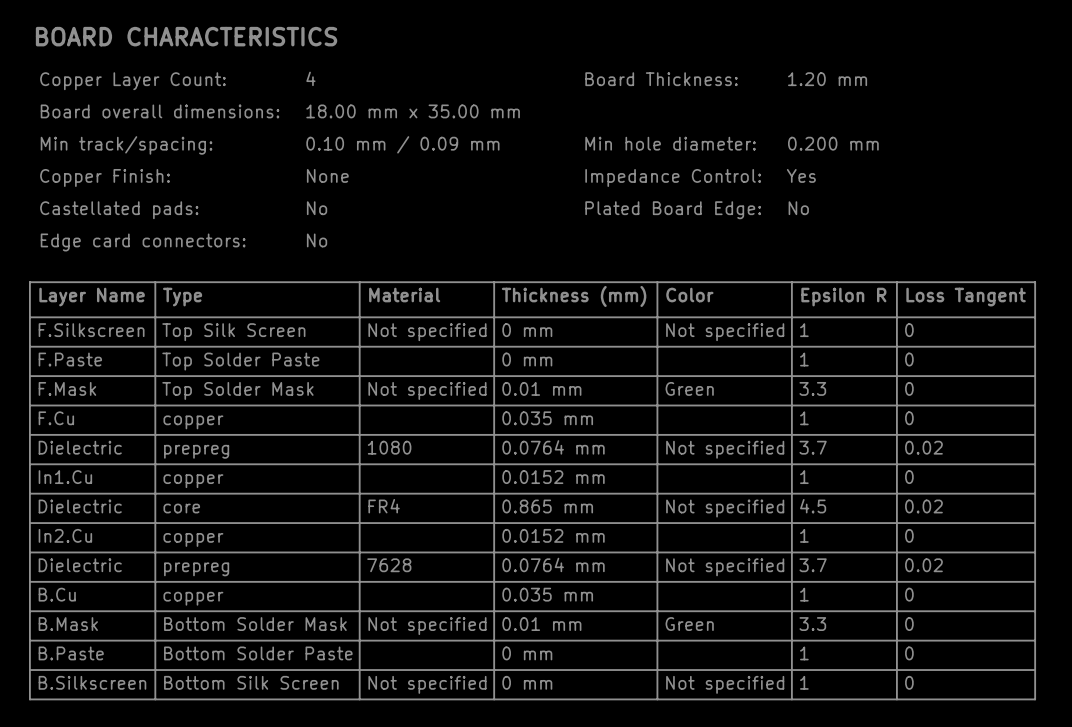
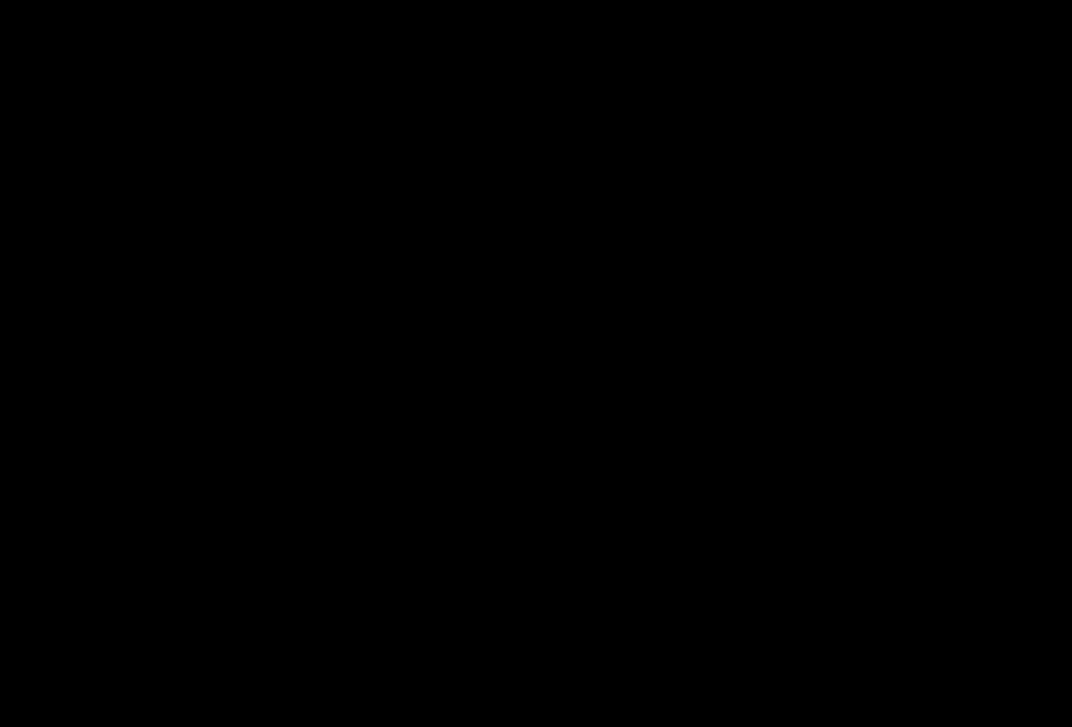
text: BOARD CHARACTERISTICS (186, 36) -> none
text: 4 (310, 78) -> none
text: Board Thickness: (661, 79) -> none
text: 1.20 mm (827, 79) -> none
text: Copper Layer Count: (132, 81) -> none
text: Board overall dimensions: (160, 111) -> none
text: 18.00 mm x 35.00 mm (413, 111) -> none
text: Min hole diameter: (670, 143) -> none
text: 0.200 mm (833, 143) -> none
text: 0.10 mm / 0.09 mm (402, 144) -> none
text: Min track/spacing: (126, 145) -> none
text: None (327, 175) -> none
text: Yes (801, 175) -> none
text: Copper Finish: (105, 177) -> none
text: Impedance Control: (673, 177) -> none
text: No (317, 208) -> none
text: No (798, 208) -> none
text: Castellated pads: (119, 210) -> none
text: Plated Board Edge: (673, 210) -> none
text: No (317, 240) -> none
text: Edge card connectors: (143, 242) -> none
line: (29, 282) (29, 699) (1035, 699) (1035, 282) (29, 282) -> none
line: (155, 282) (155, 699) -> none
line: (359, 282) (359, 699) -> none
line: (494, 282) (494, 699) -> none
line: (657, 282) (657, 699) -> none
line: (791, 282) (791, 699) -> none
line: (896, 282) (896, 699) -> none
text: Material (404, 295) -> none
text: Color (689, 295) -> none
text: Thickness (mm) (574, 296) -> none
text: Layer Name (92, 297) -> none
text: Type (182, 297) -> none
text: Epsilon R (843, 297) -> none
text: Loss Tangent (966, 297) -> none
line: (29, 317) (1035, 317) -> none
text: F.Silkscreen (91, 330) -> none
text: 0 mm (527, 330) -> none
text: 1 (804, 330) -> none
text: 0 (909, 330) -> none
text: Top Silk Screen (233, 332) -> none
text: Not specified (427, 332) -> none
text: Not specified (725, 332) -> none
line: (29, 346) (1035, 346) -> none
text: F.Paste (70, 359) -> none
text: 0 mm (527, 359) -> none
text: 1 (804, 359) -> none
text: 0 (909, 359) -> none
text: Top Solder Paste (240, 361) -> none
line: (29, 376) (1035, 376) -> none
text: F.Mask (67, 388) -> none
text: 0.01 mm (541, 388) -> none
text: Green (689, 388) -> none
text: 3.3 (812, 388) -> none
text: 0 (909, 388) -> none
text: Top Solder Mask (237, 390) -> none
text: Not specified (427, 390) -> none
line: (29, 405) (1035, 405) -> none
text: F.Cu (56, 418) -> none
text: 0.035 mm (547, 418) -> none
text: 1 (804, 418) -> none
text: 0 (909, 418) -> none
text: copper (193, 422) -> none
line: (29, 434) (1035, 434) -> none
text: Dielectric (80, 447) -> none
text: 1080 (389, 447) -> none
text: 0.0764 mm (553, 447) -> none
text: 3.7 (813, 447) -> none
text: 0.02 (923, 447) -> none
text: Not specified (725, 449) -> none
text: prepreg (196, 451) -> none
line: (29, 464) (1035, 464) -> none
text: In1.Cu (65, 477) -> none
text: 0.0152 mm (553, 477) -> none
text: 1 (804, 477) -> none
text: 0 (909, 477) -> none
text: copper (193, 481) -> none
line: (29, 493) (1035, 493) -> none
text: Dielectric (80, 506) -> none
text: FR4 (384, 506) -> none
text: 0.865 mm (547, 506) -> none
text: 4.5 (813, 506) -> none
text: 0.02 (923, 506) -> none
text: core (181, 508) -> none
text: Not specified (725, 508) -> none
line: (29, 523) (1035, 523) -> none
text: In2.Cu (65, 535) -> none
text: 0.0152 mm (553, 535) -> none
text: 1 (804, 535) -> none
text: 0 (909, 535) -> none
text: copper (193, 539) -> none
line: (29, 552) (1035, 552) -> none
text: 0.0764 mm (553, 564) -> none
text: Dielectric (80, 565) -> none
text: 7628 (389, 565) -> none
text: 3.7 (813, 565) -> none
text: 0.02 (923, 565) -> none
text: Not specified (725, 567) -> none
text: prepreg (196, 569) -> none
line: (29, 581) (1035, 581) -> none
text: B.Cu (57, 594) -> none
text: 0.035 mm (547, 594) -> none
text: 1 (804, 594) -> none
text: 0 (909, 594) -> none
text: copper (193, 598) -> none
line: (29, 611) (1035, 611) -> none
text: B.Mask (68, 624) -> none
text: Bottom Solder Mask (255, 624) -> none
text: 0.01 mm (541, 624) -> none
text: Green (689, 624) -> none
text: 3.3 (812, 624) -> none
text: 0 (909, 624) -> none
text: Not specified (427, 626) -> none
line: (29, 640) (1035, 640) -> none
text: B.Paste (71, 653) -> none
text: Bottom Solder Paste (258, 653) -> none
text: 0 mm (527, 653) -> none
text: 1 (804, 653) -> none
text: 0 (909, 653) -> none
line: (29, 670) (1035, 670) -> none
text: B.Silkscreen (92, 682) -> none
text: Bottom Silk Screen (251, 682) -> none
text: 0 mm (527, 682) -> none
text: 1 (804, 682) -> none
text: 0 (909, 682) -> none
text: Not specified (427, 684) -> none
text: Not specified (725, 684) -> none

